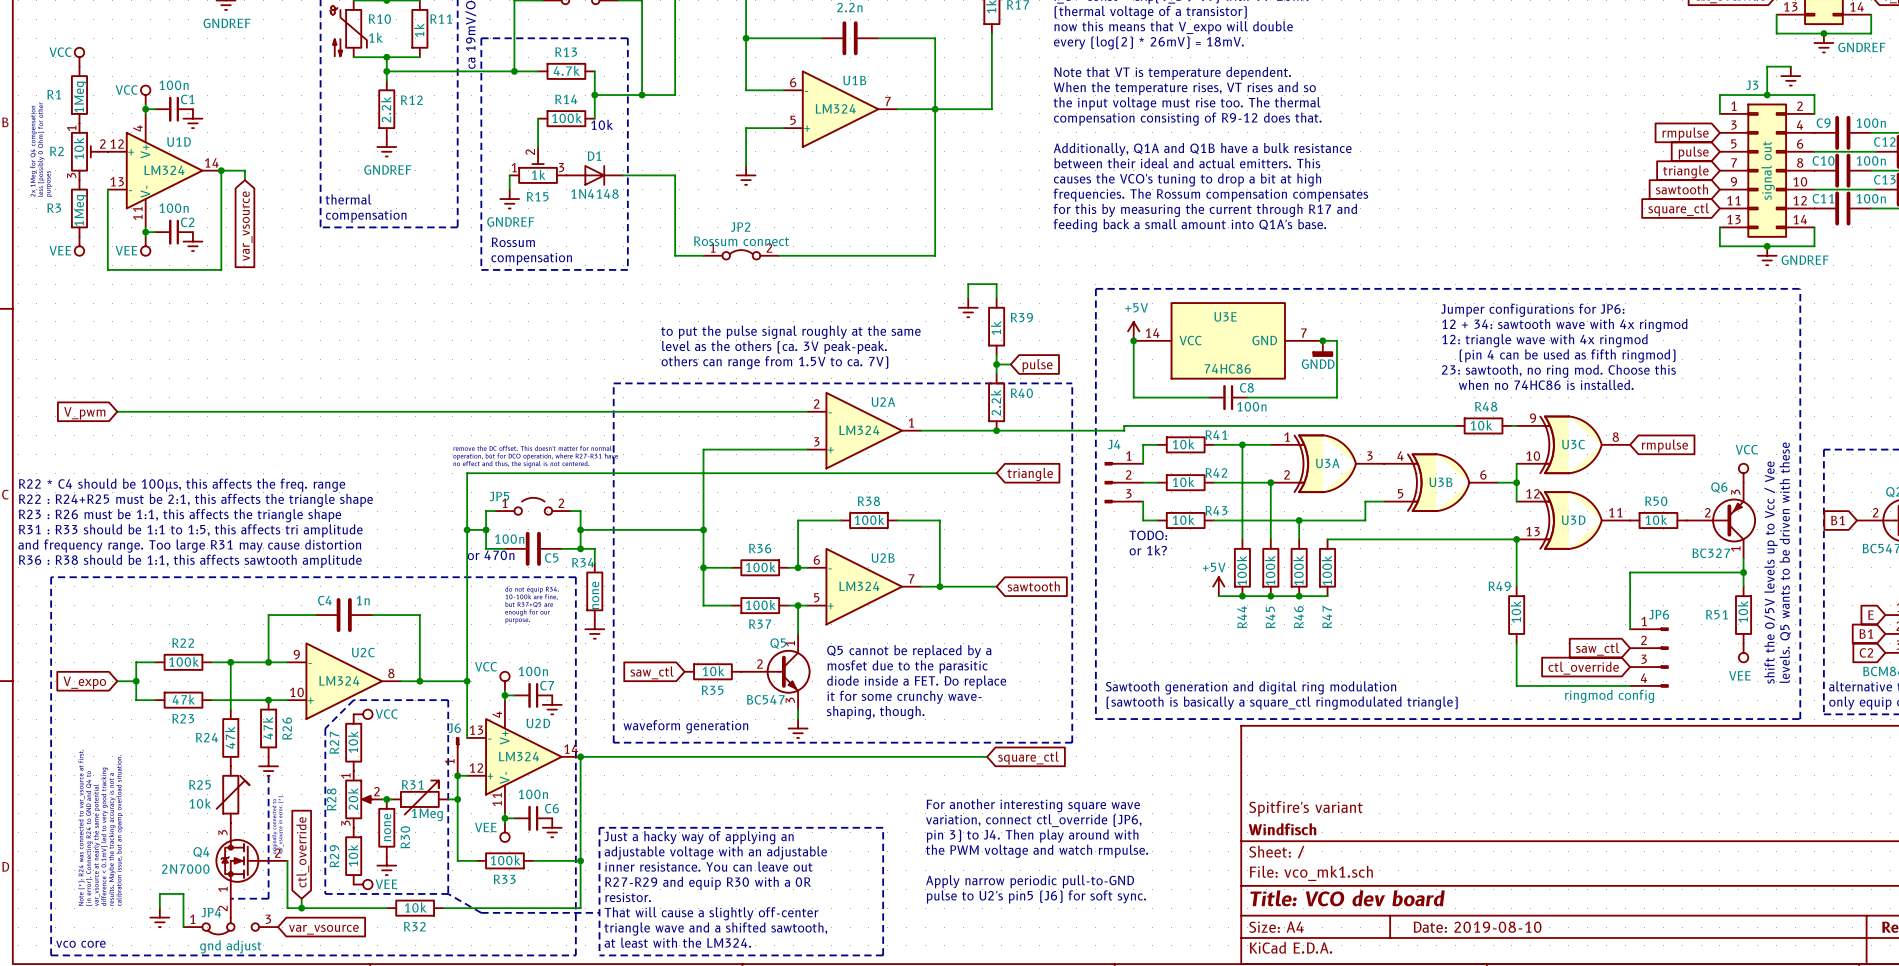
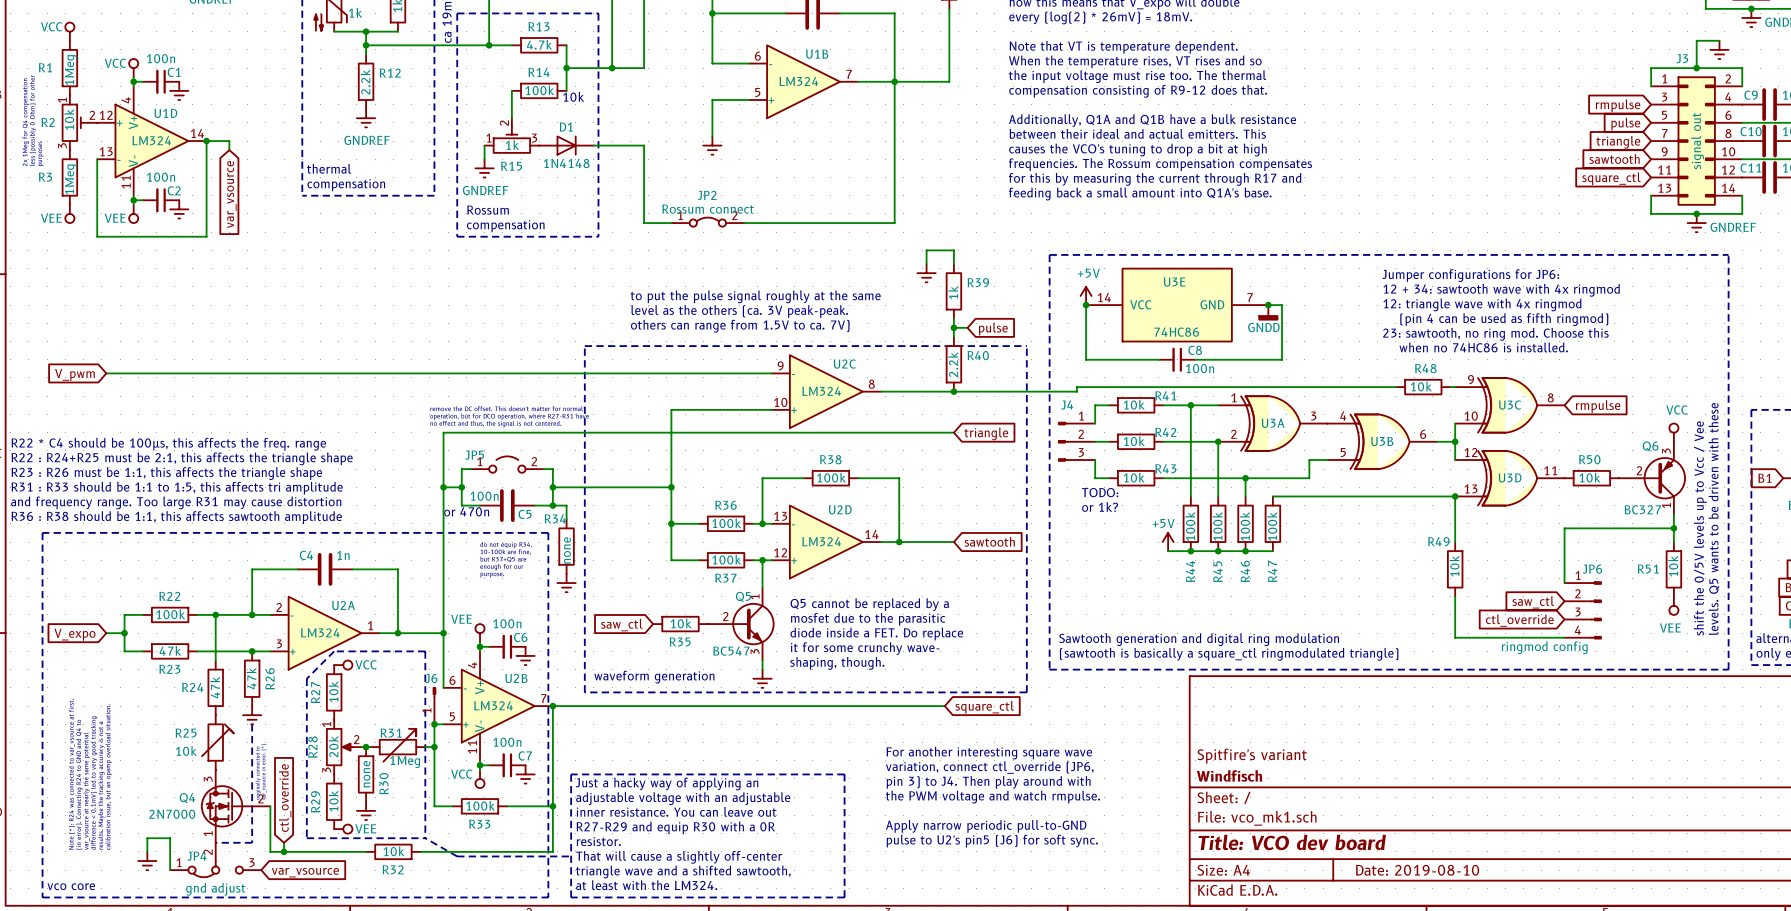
U2A position: (864, 430) -> (325, 633)
U2B position: (864, 586) -> (498, 706)
U2C position: (344, 681) -> (826, 391)
power symbol: VCC (504, 681) -> VEE (480, 633)
C7 name: C7 (547, 685) -> C6 (520, 637)
U2D position: (523, 756) -> (826, 542)
C6 name: C6 (551, 808) -> C7 (525, 755)
power symbol: VEE (504, 832) -> VCC (480, 778)

